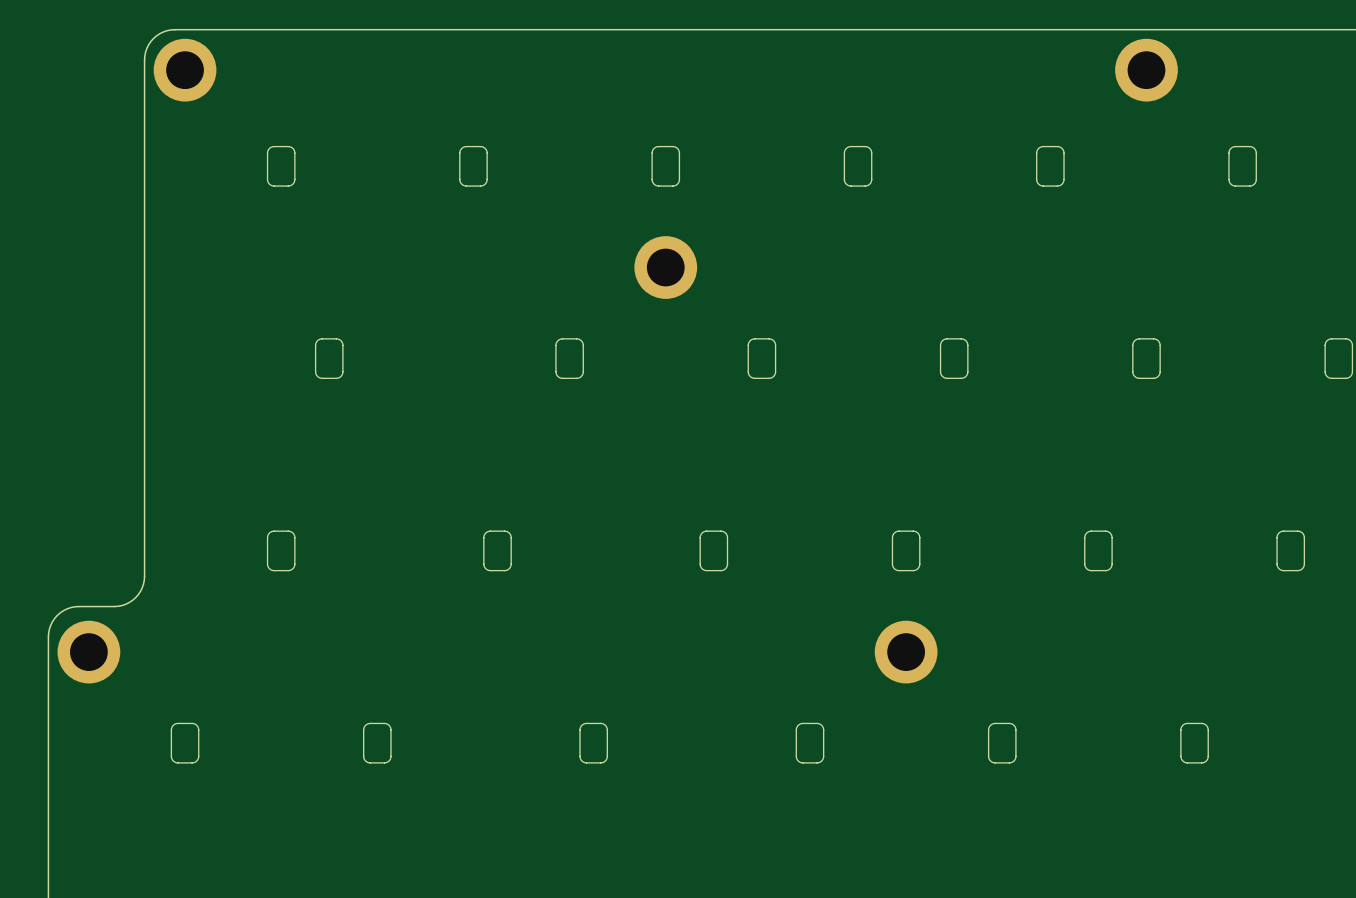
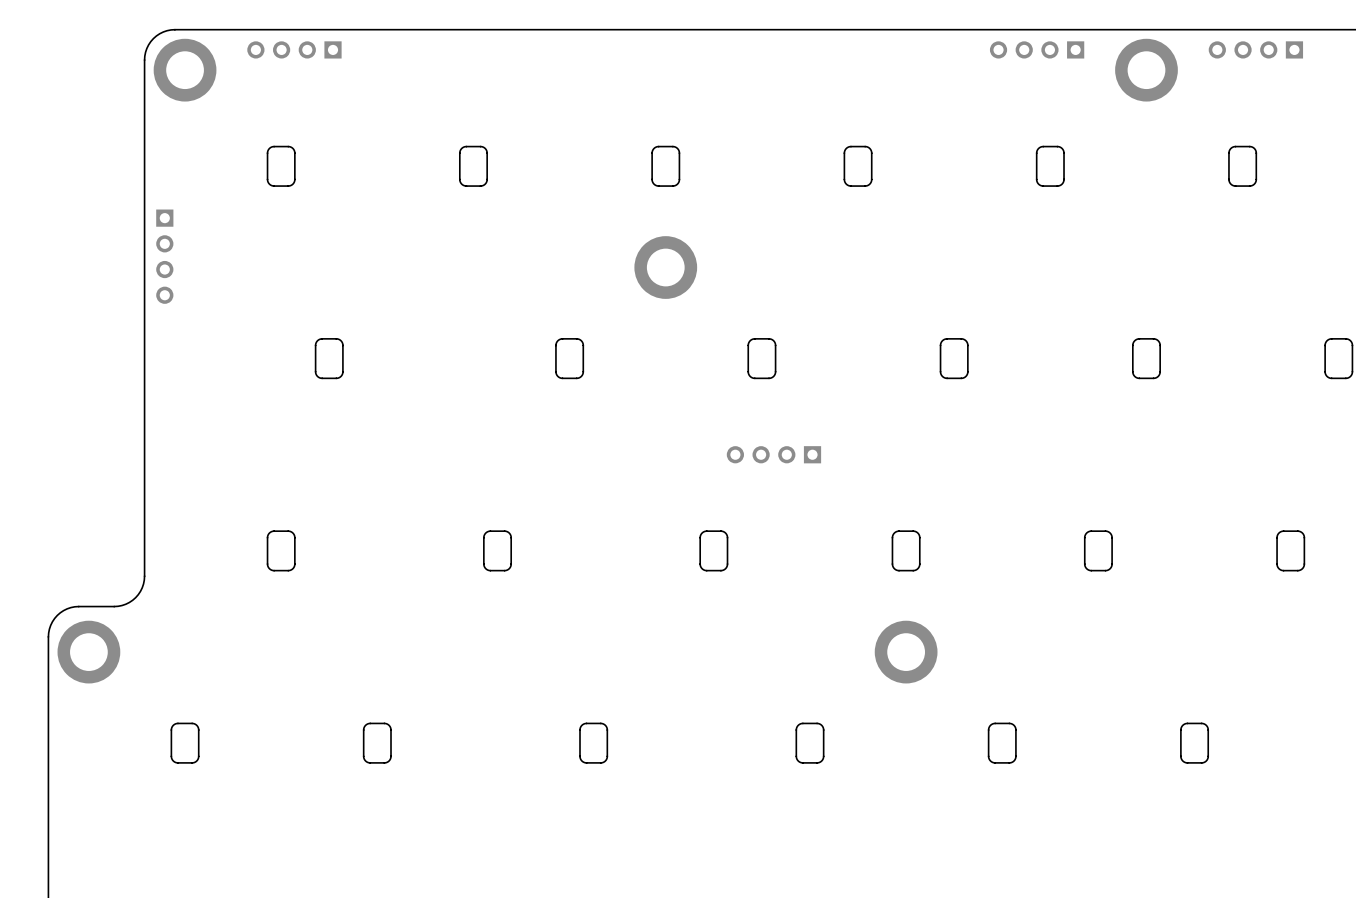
part: none -> (294, 49)
part: none -> (1037, 49)
part: none -> (1255, 49)
part: none -> (164, 256)
part: none -> (773, 454)

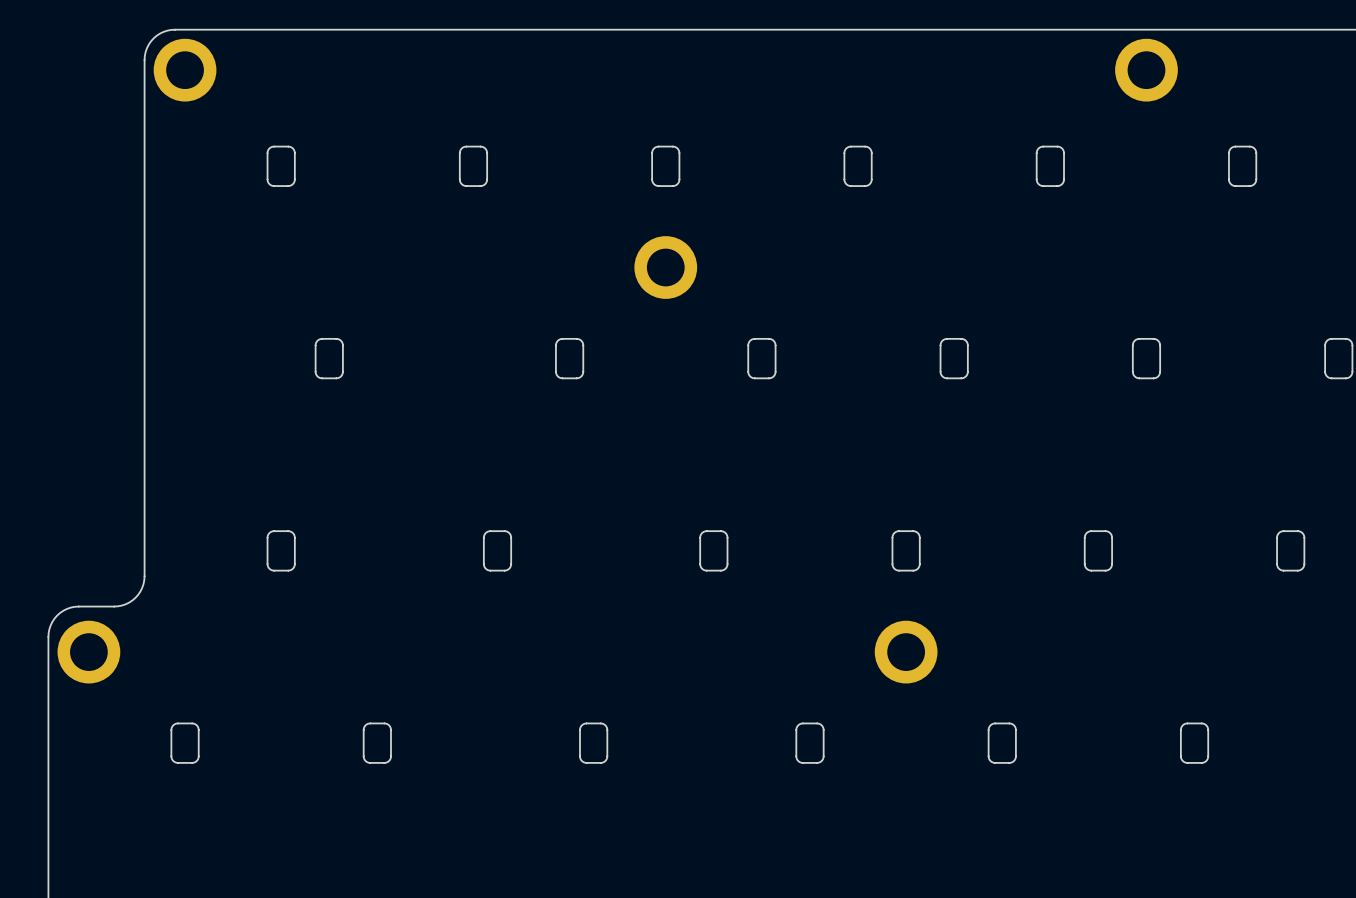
part: (294, 49) -> none
part: (1037, 49) -> none
part: (1255, 49) -> none
part: (164, 256) -> none
part: (773, 454) -> none

